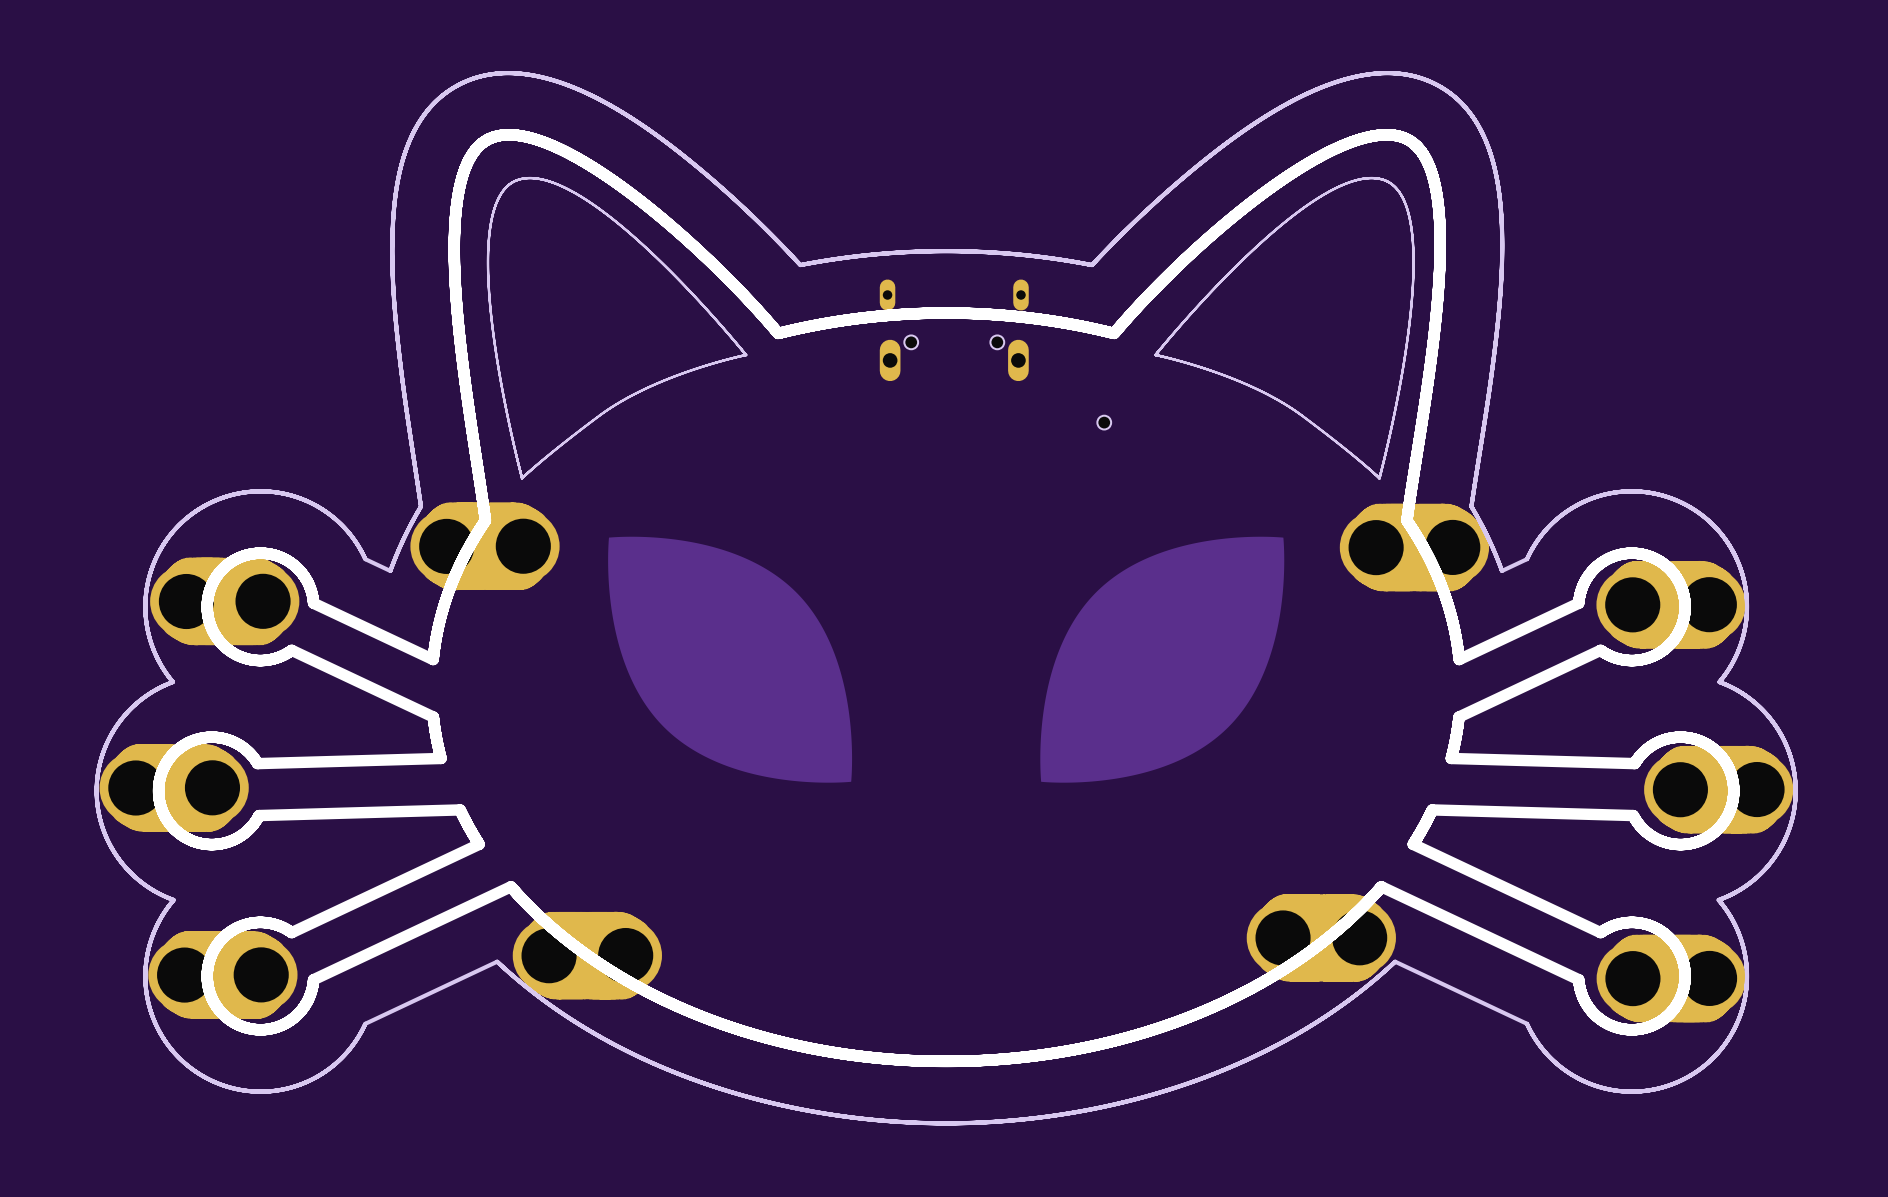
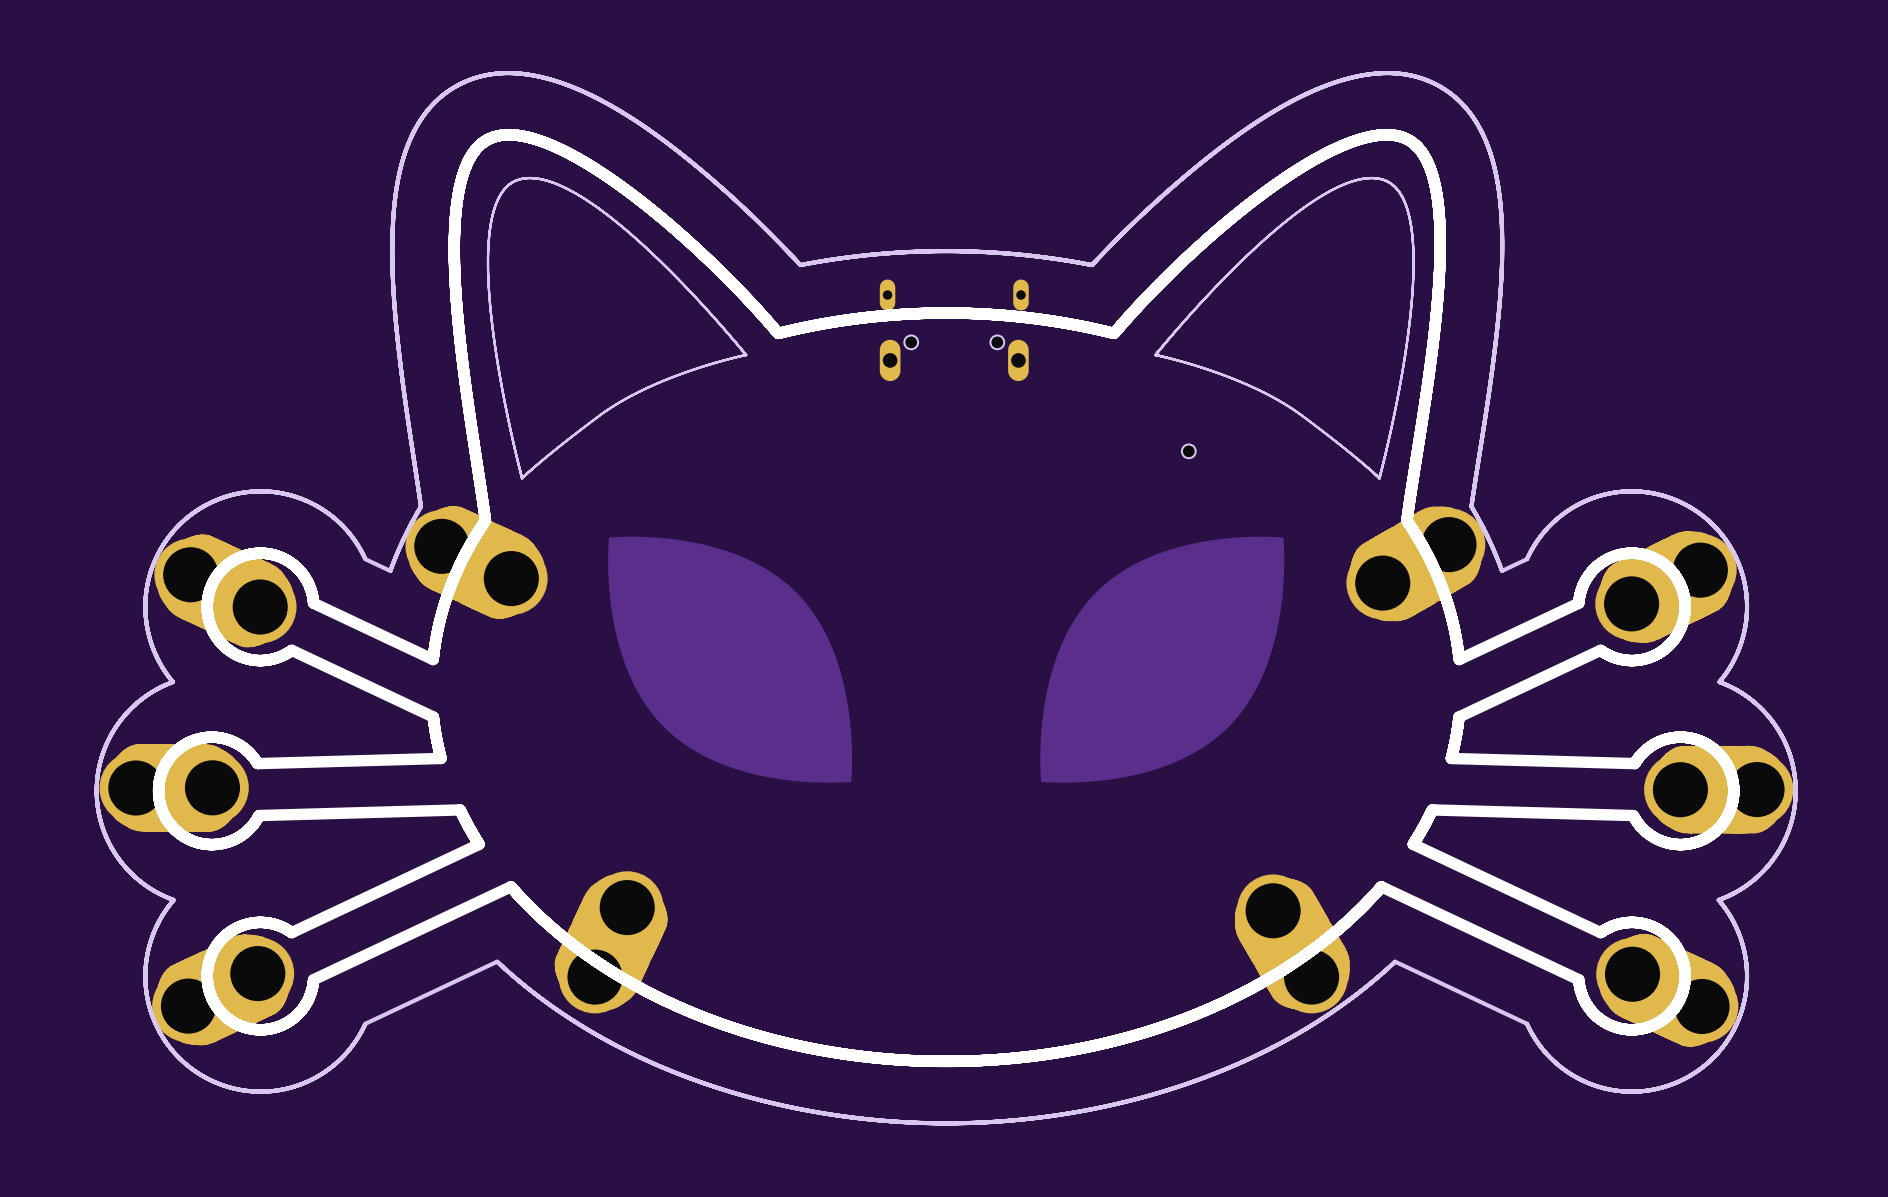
part position: (1104, 422) -> (1188, 451)
part: (485, 546) -> none
part rotation: 0° (1414, 547) -> 30° counterclockwise (1415, 563)
part: none -> (476, 562)
part: none -> (1665, 587)
part rotation: 0° (224, 601) -> 155° counterclockwise (225, 590)
part: (1671, 604) -> none
part: (1321, 937) -> none
part: none -> (611, 942)
part: none -> (1292, 943)
part: (587, 955) -> none
part rotation: 0° (222, 974) -> 25° counterclockwise (223, 989)
part rotation: 0° (1671, 978) -> 25° clockwise (1667, 990)

